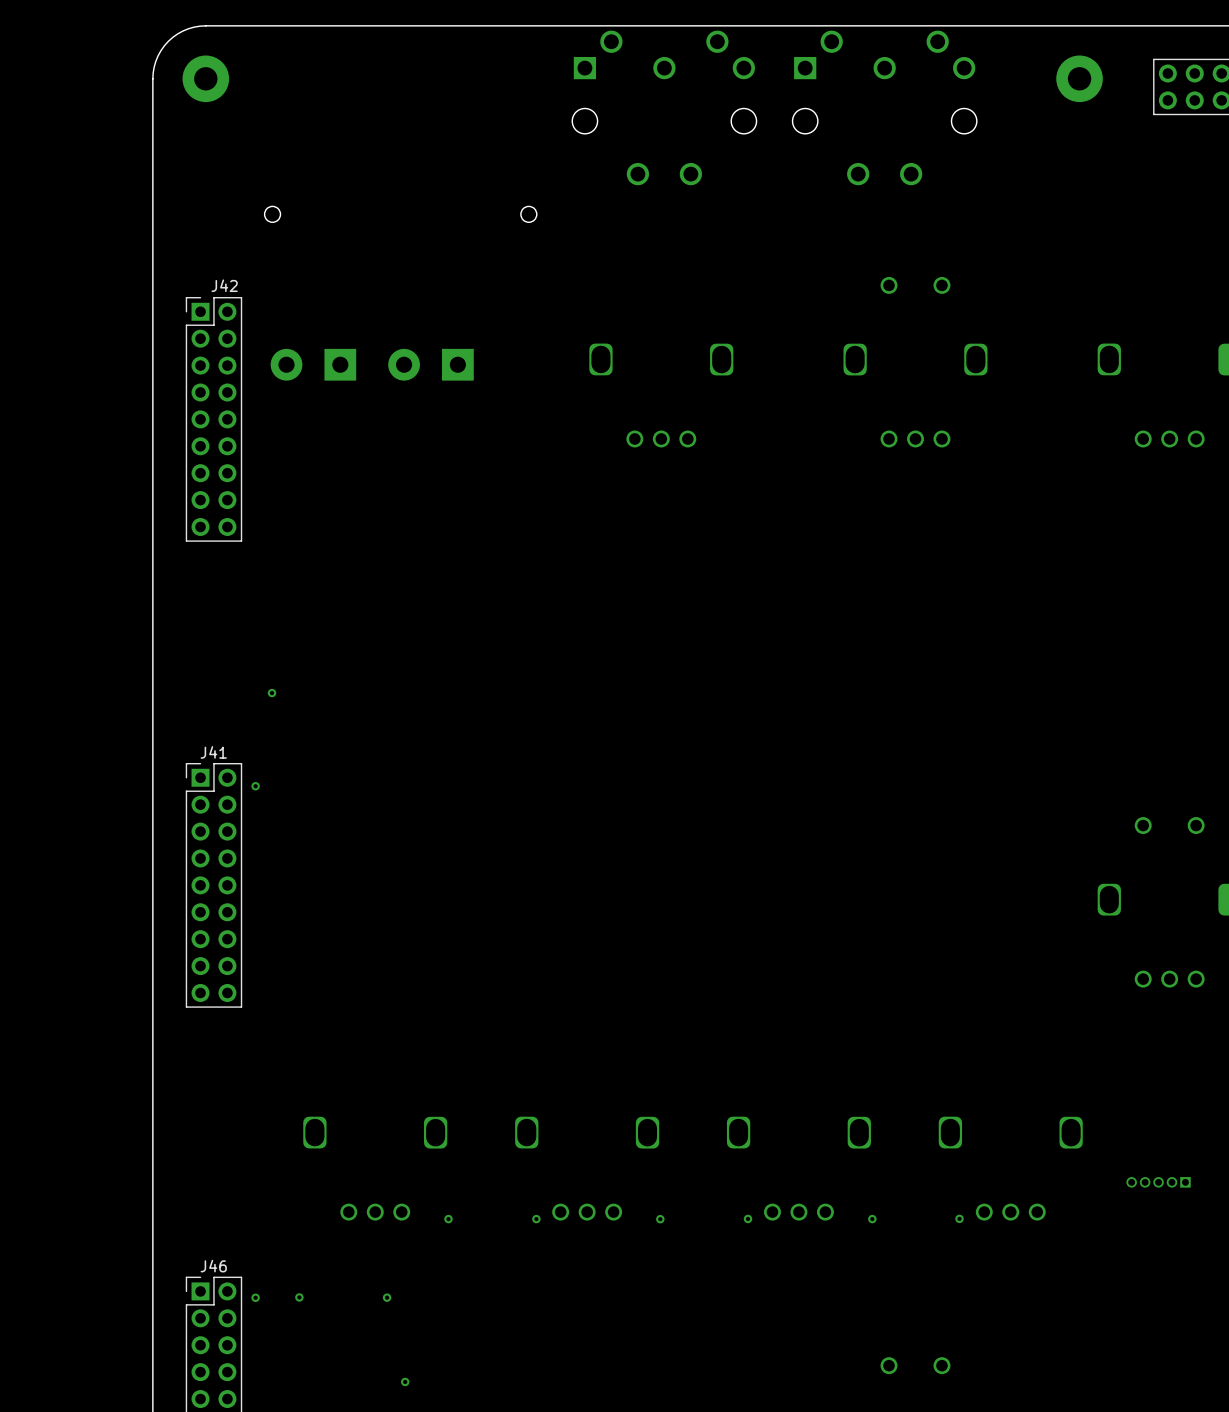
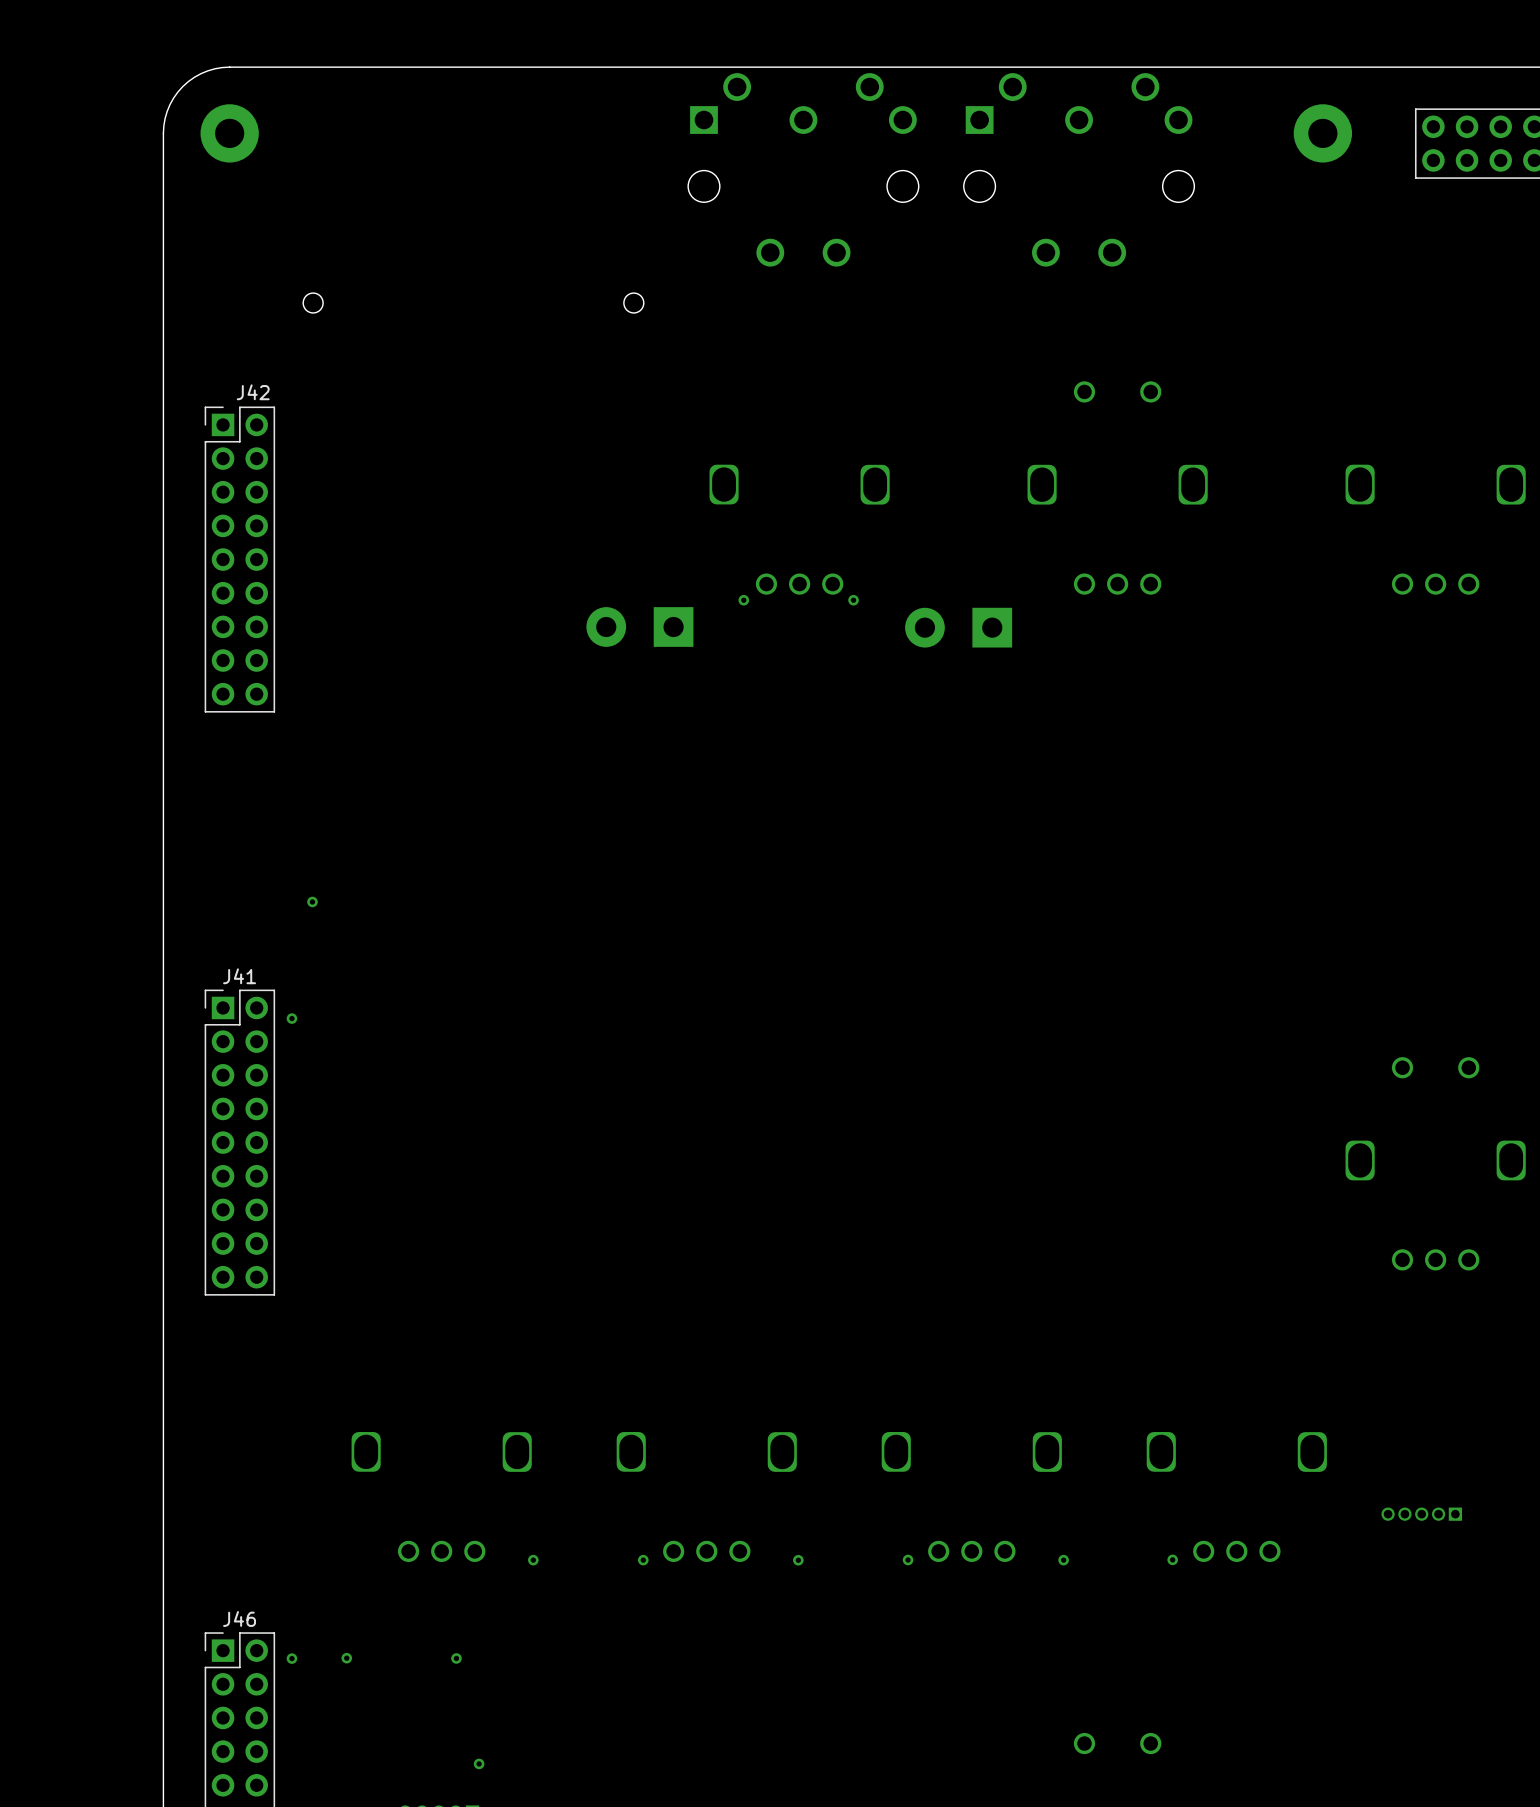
part: (313, 364) -> none
part: (430, 364) -> none
via: none -> (743, 600)
via: none -> (853, 600)
part: none -> (639, 627)
part: none -> (958, 627)

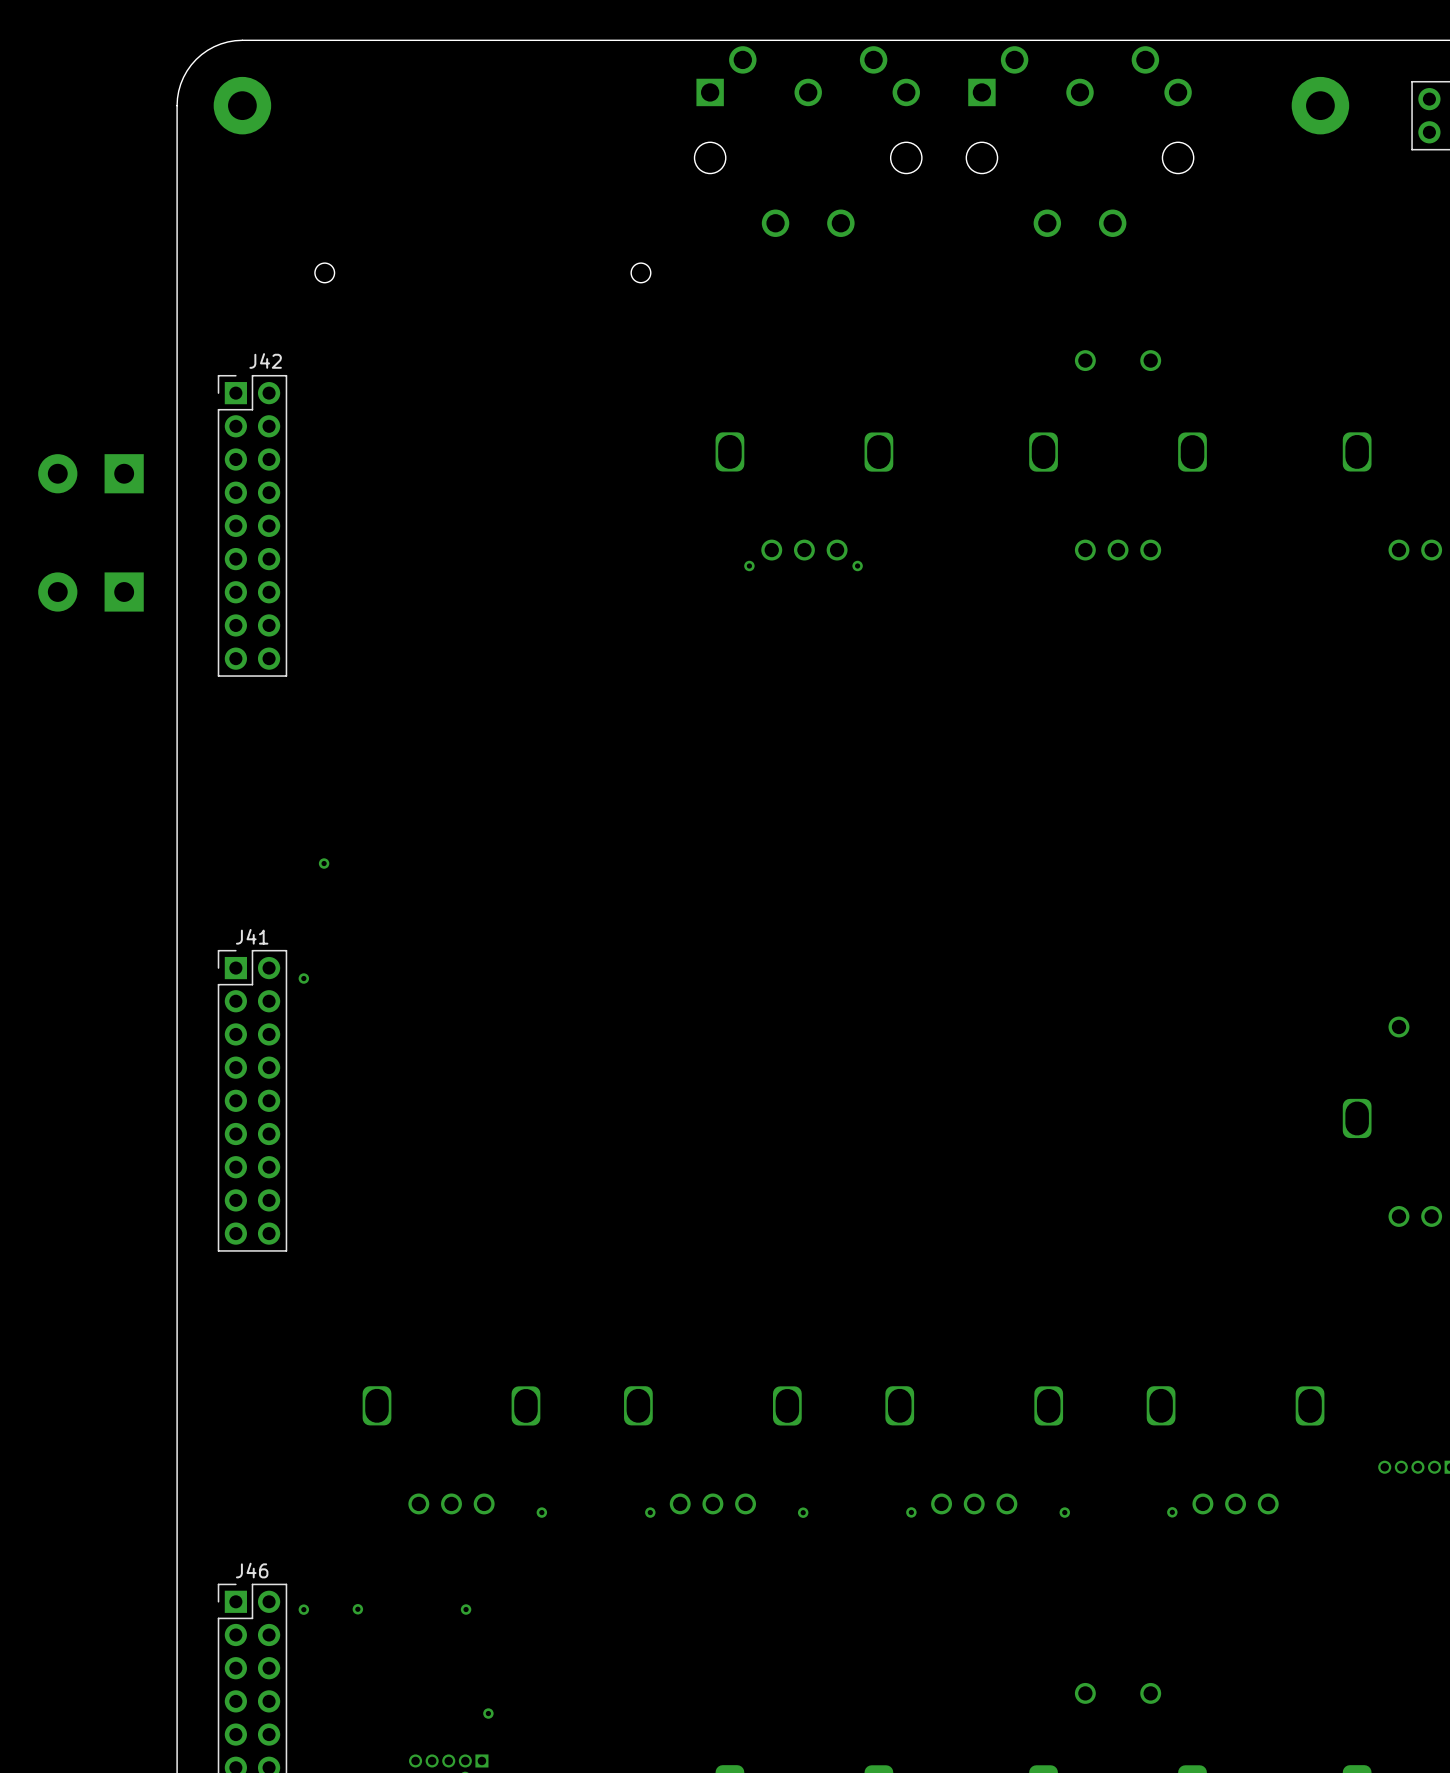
part: none -> (90, 473)
part: none -> (90, 592)
part: (639, 627) -> none
part: (958, 627) -> none

